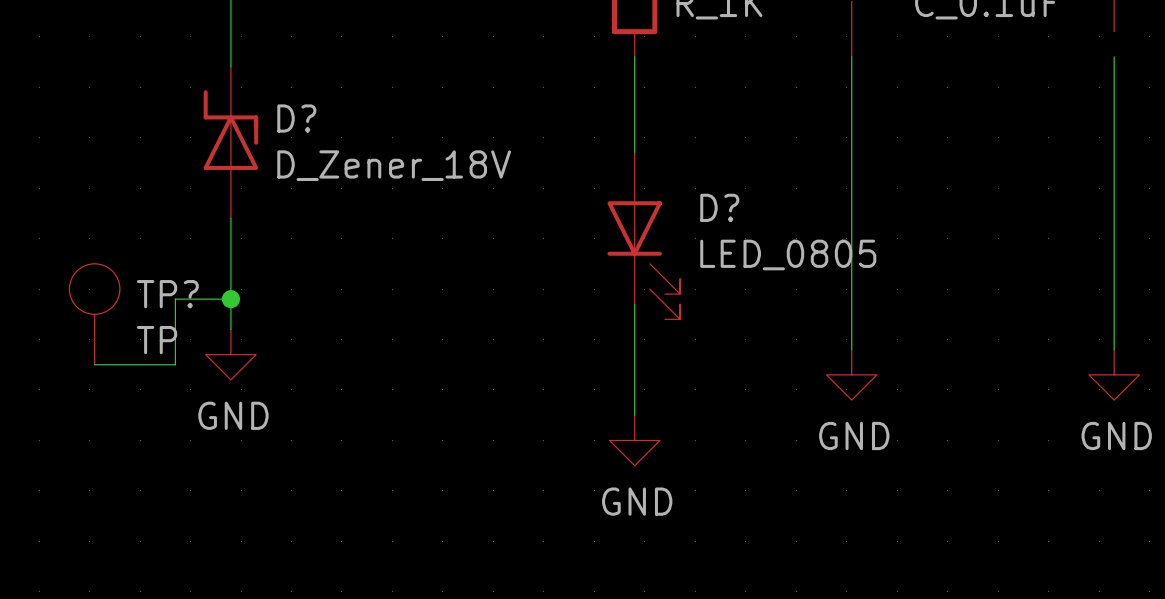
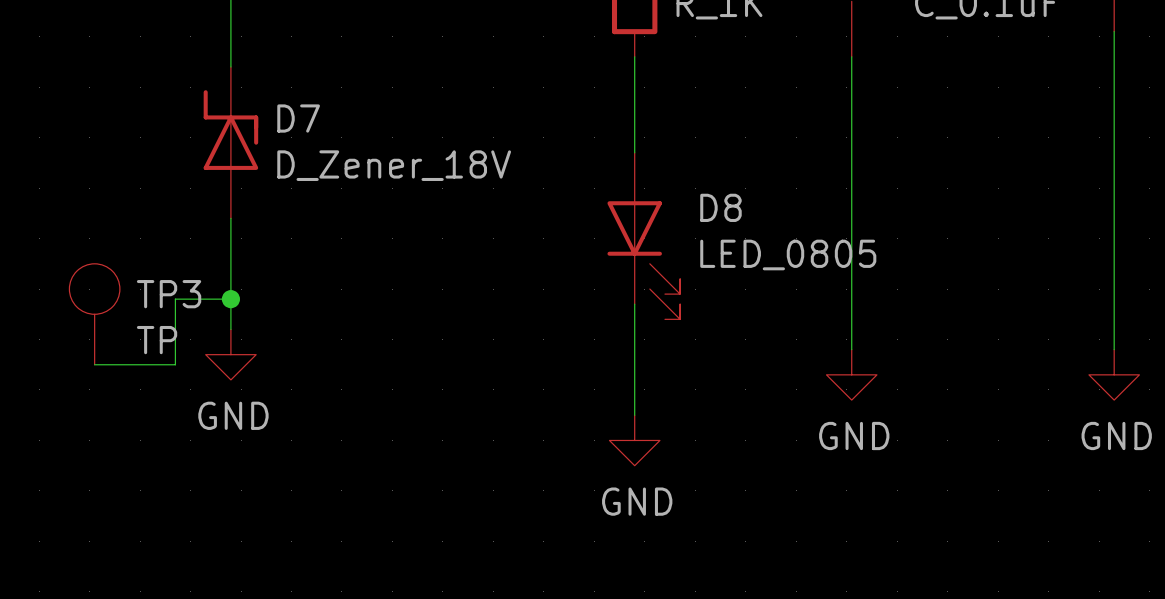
wire: none -> (1114, 31) (1114, 56)
D? name: D? (296, 118) -> D7 (298, 118)
D? name: D? (719, 207) -> D8 (720, 207)
TP? name: TP? (167, 294) -> TP3 (169, 294)

